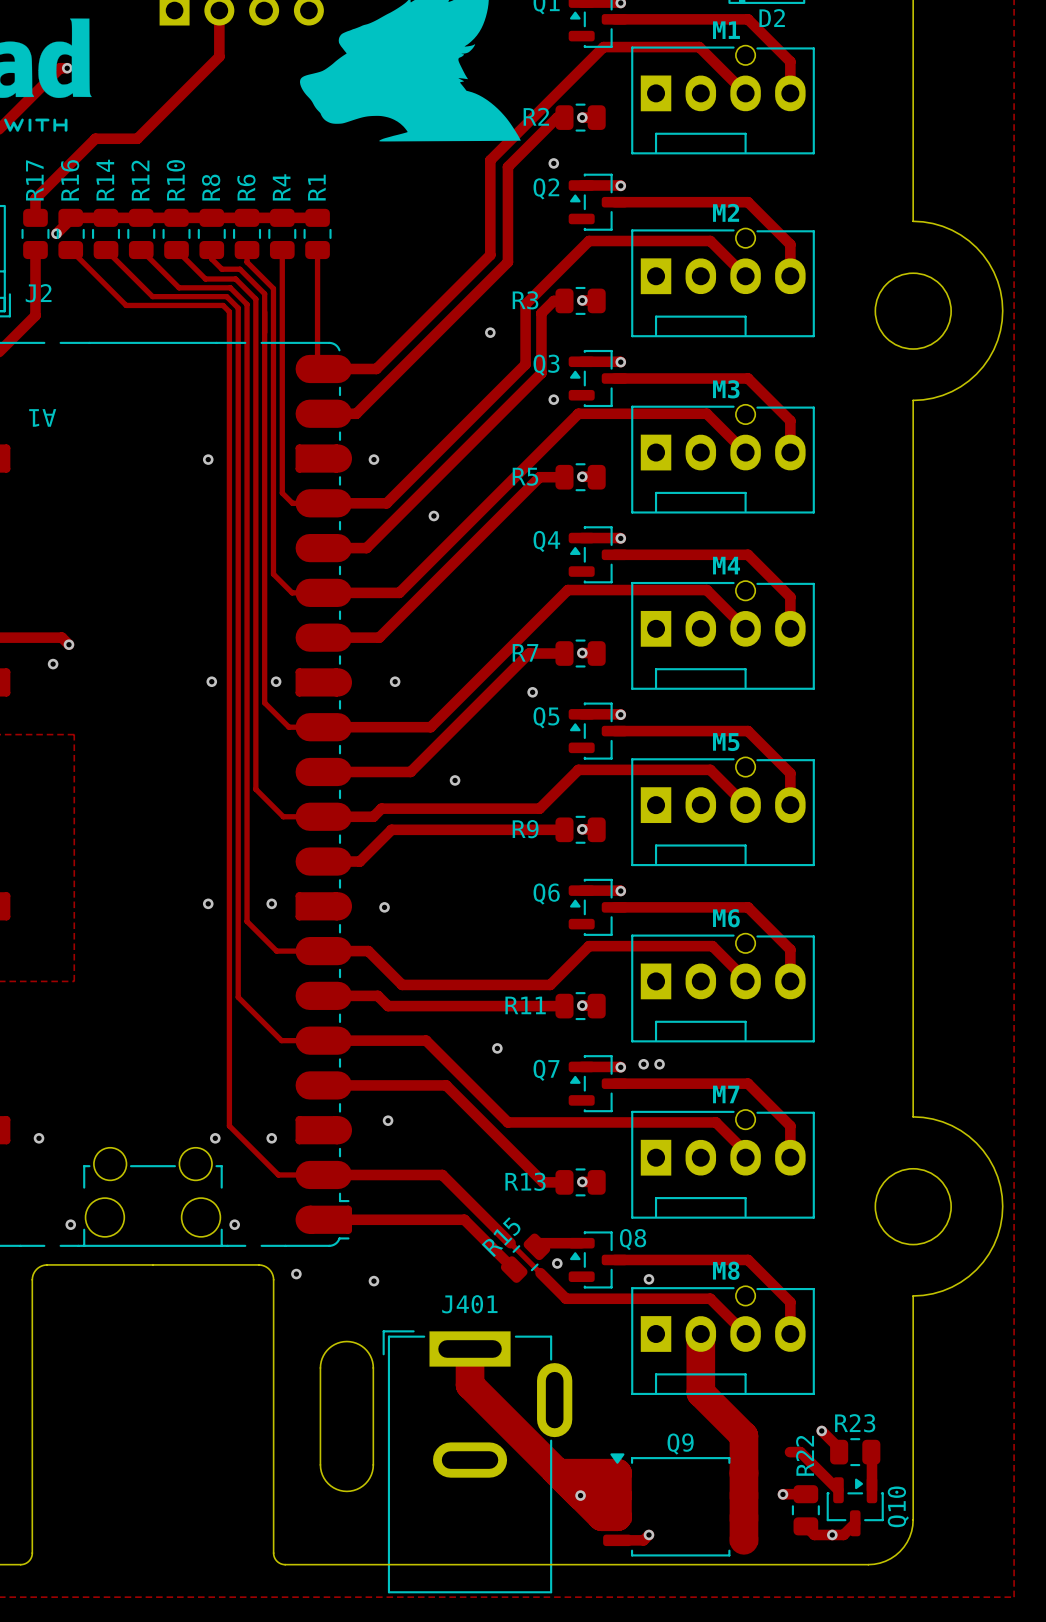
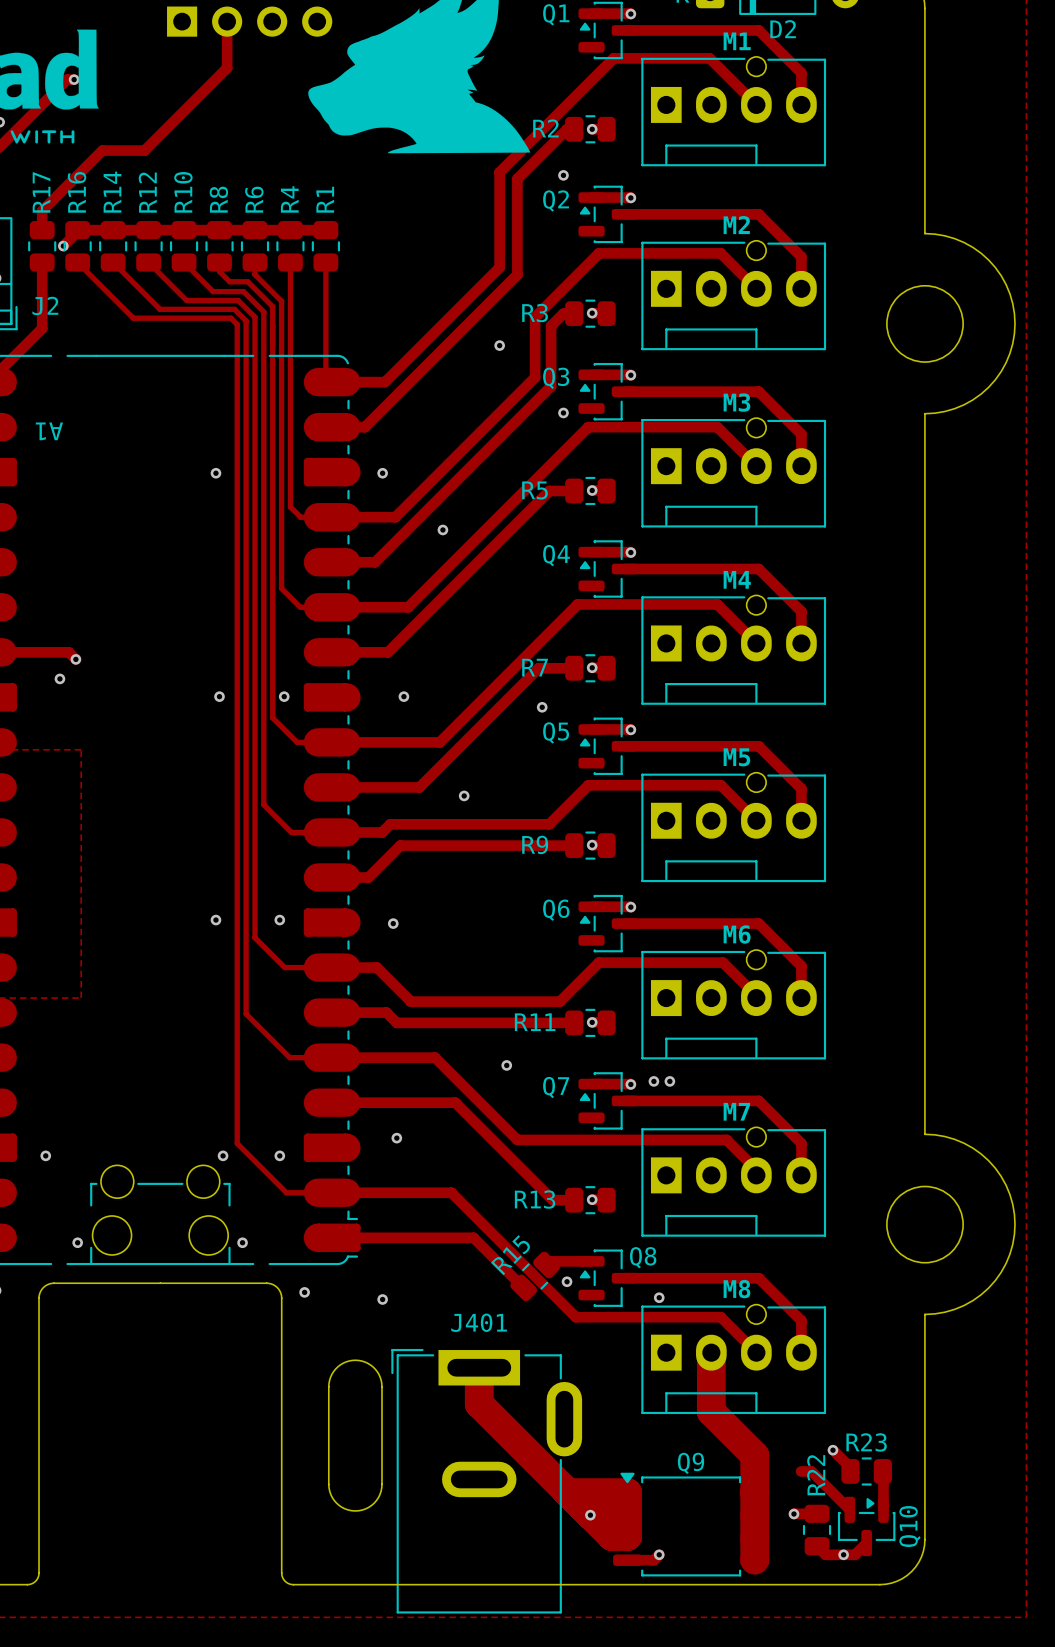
track width: thin (510, 1243) (540, 1273) -> thick (520, 1261) (550, 1291)

